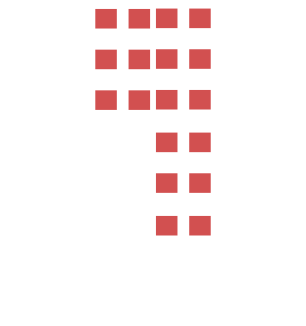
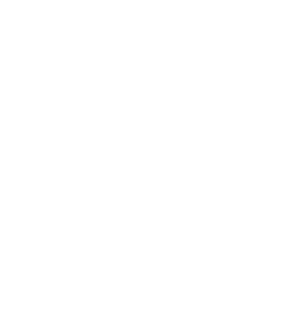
part: (122, 18) -> none
part: (183, 18) -> none
part: (122, 59) -> none
part: (183, 59) -> none
part: (183, 99) -> none
part: (122, 100) -> none
part: (183, 142) -> none
part: (183, 183) -> none
part: (183, 225) -> none

